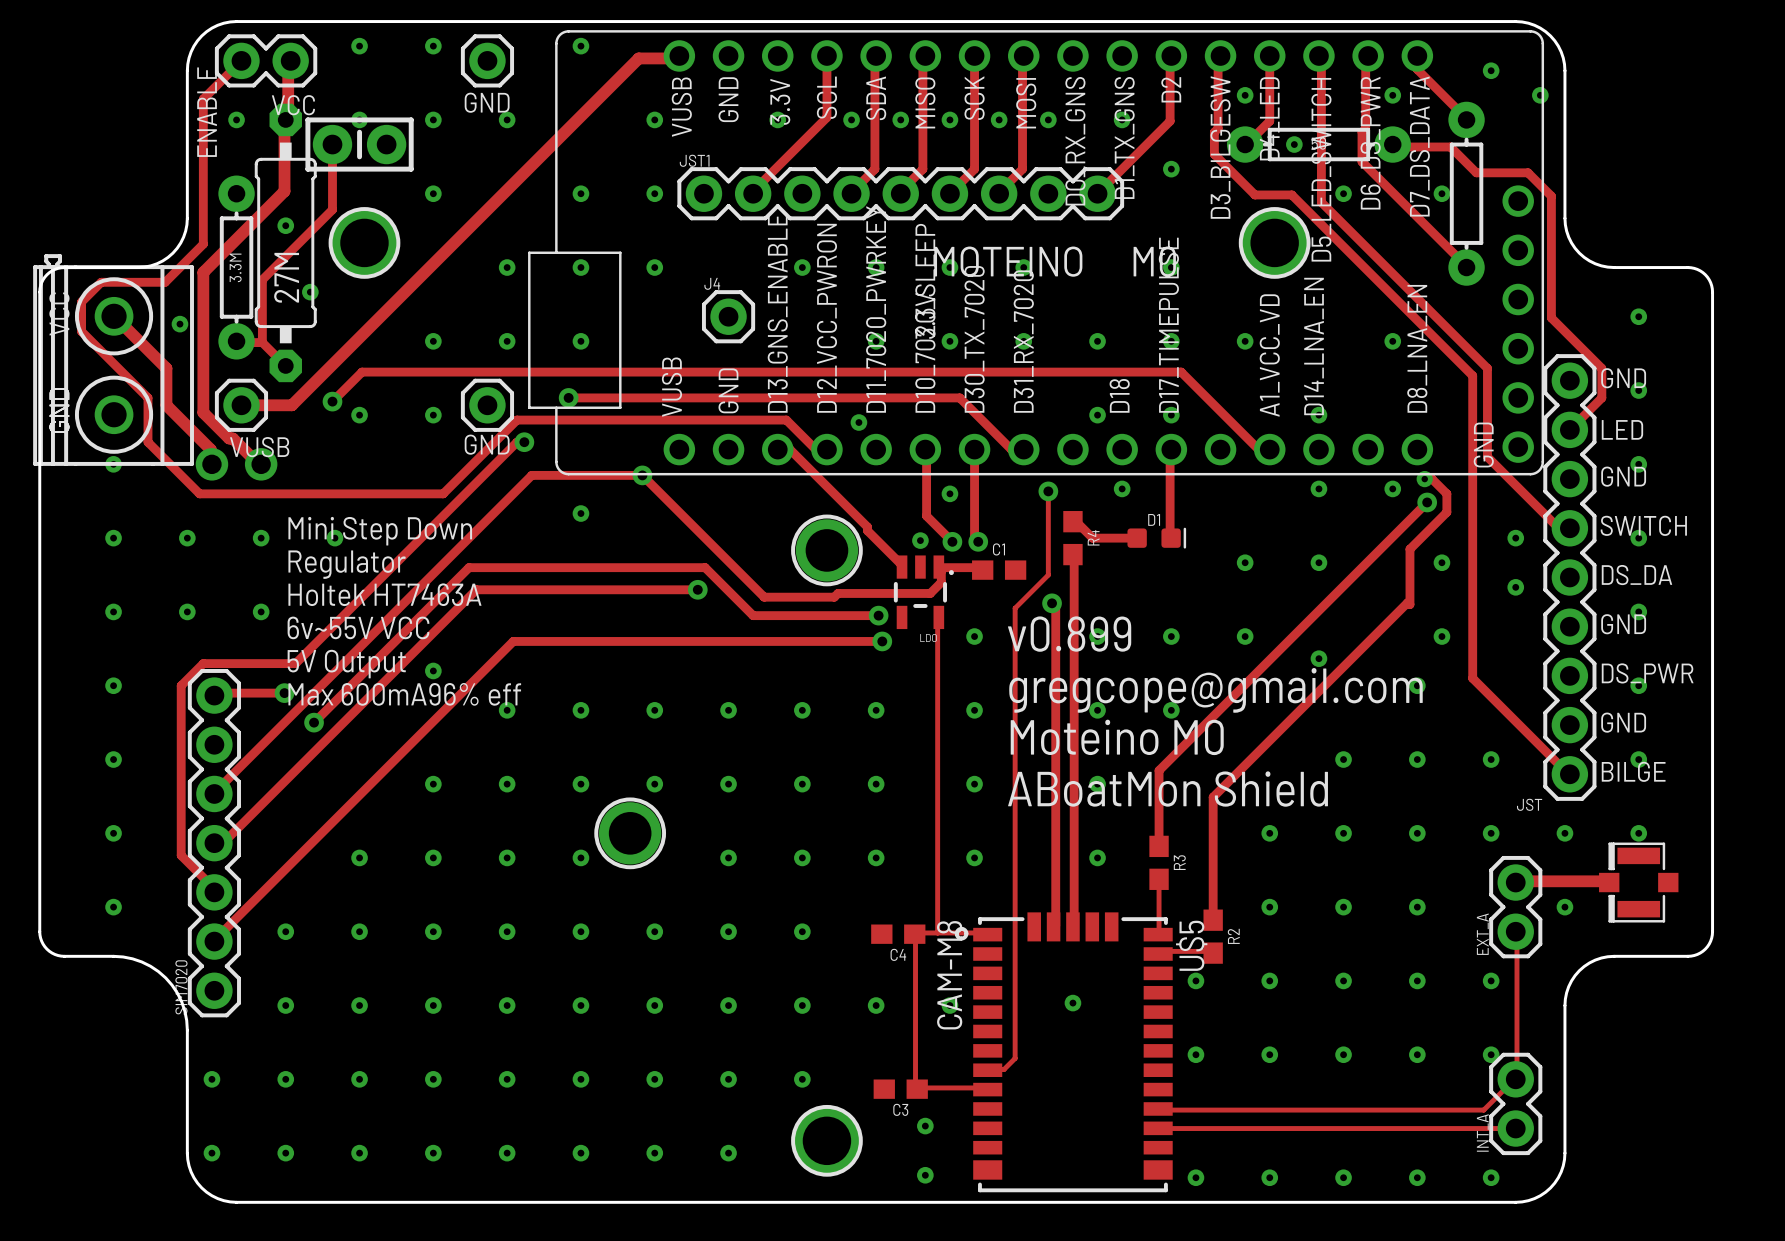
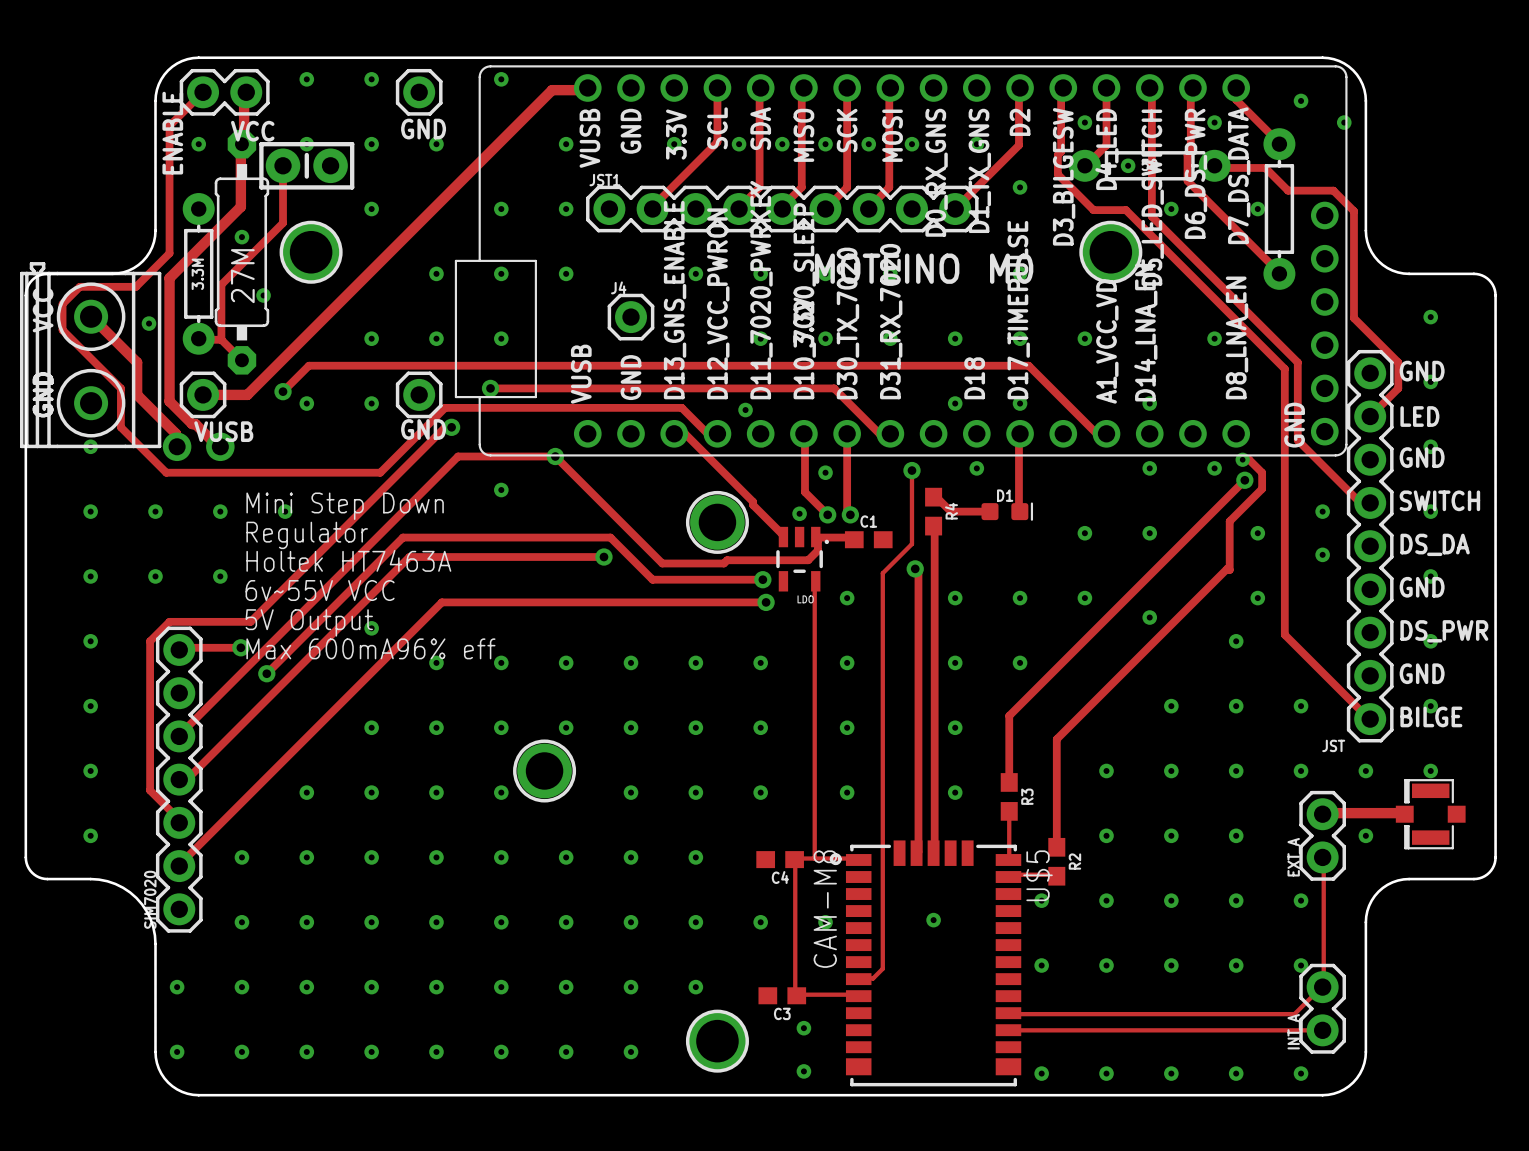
text: v0.899 (1069, 634) -> none
text: gregcope@gmail.com (1215, 690) -> none
text: Moteino M0 (1117, 737) -> none
text: ABoatMon Shield (1167, 789) -> none

